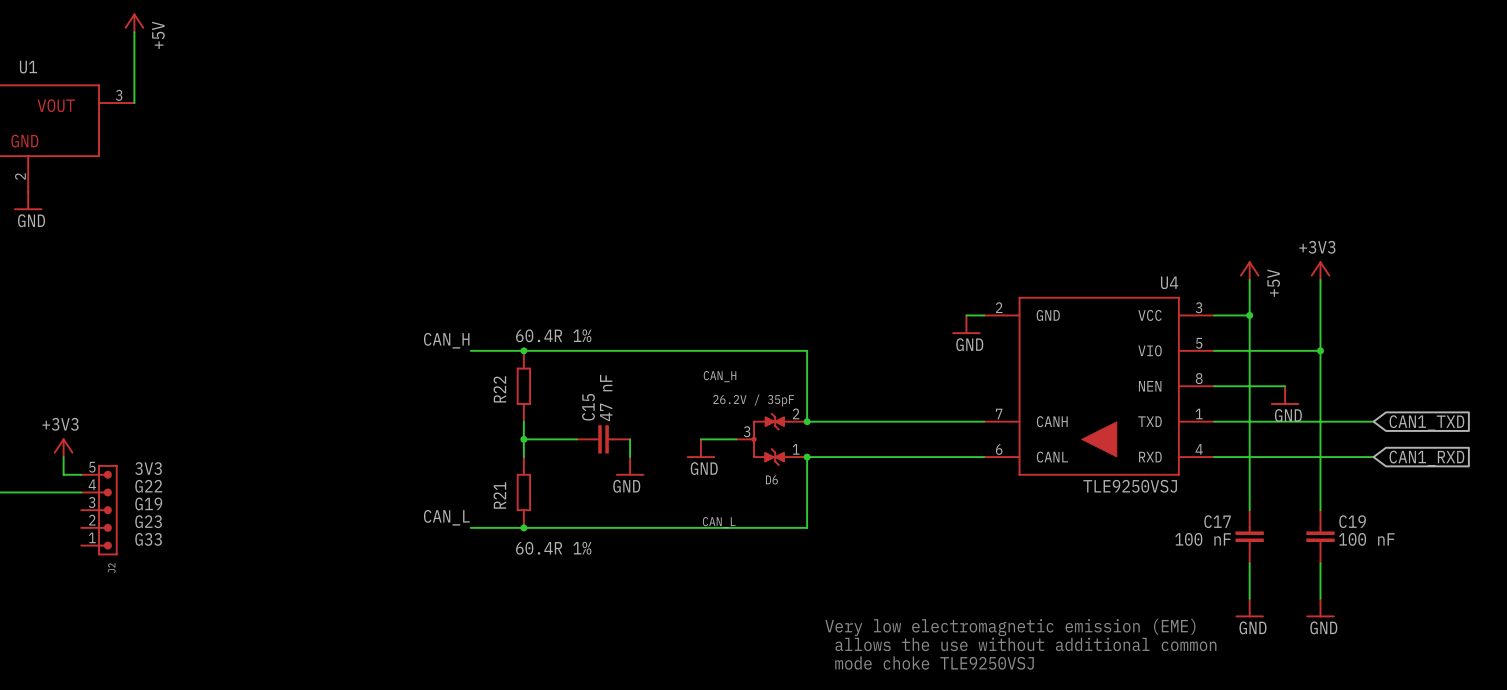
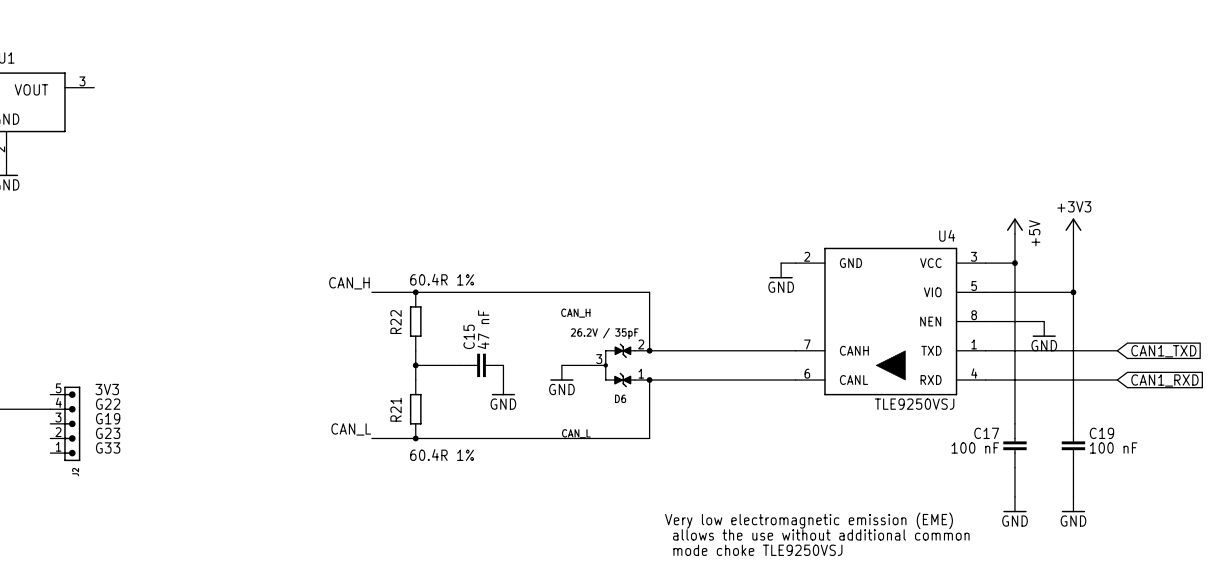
power symbol: +5V (134, 22) -> none
wire: (134, 32) (134, 103) -> none
power symbol: +3V3 (63, 447) -> none
wire: (63, 457) (63, 474) (81, 474) -> none

